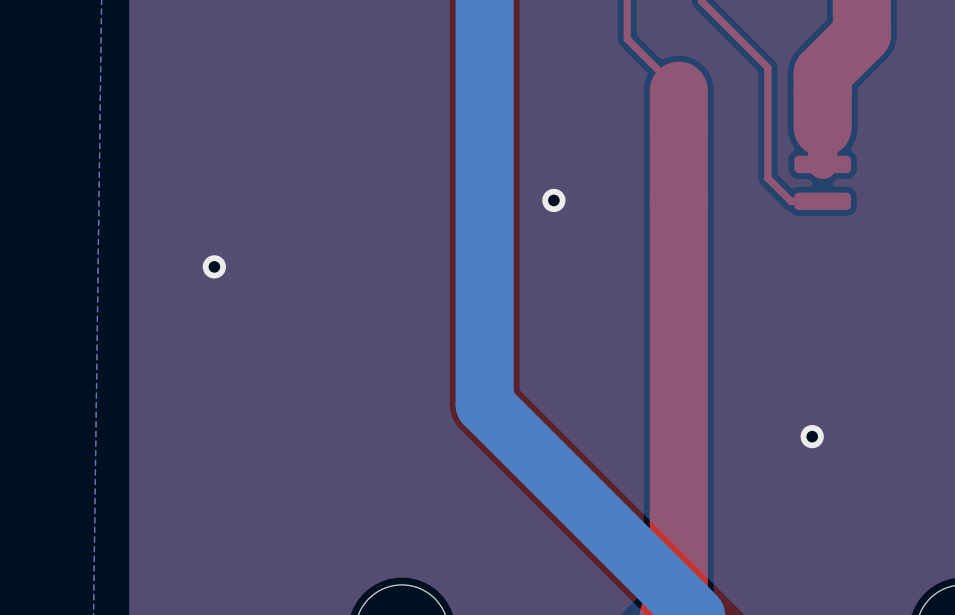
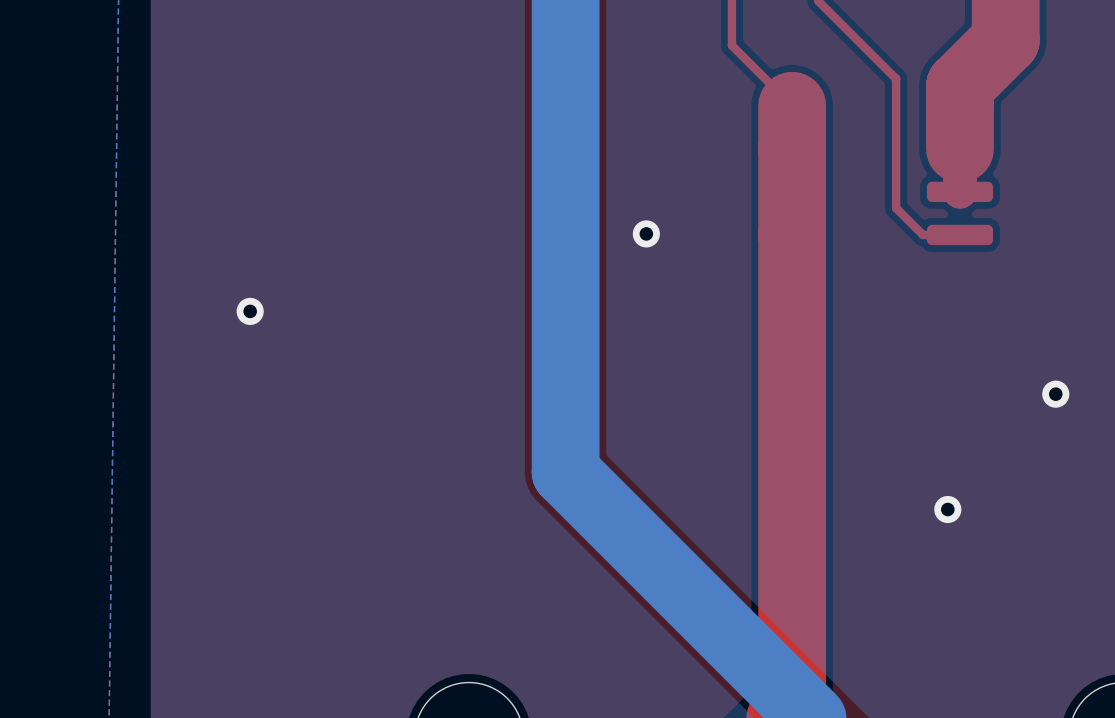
via: none -> (1055, 394)

